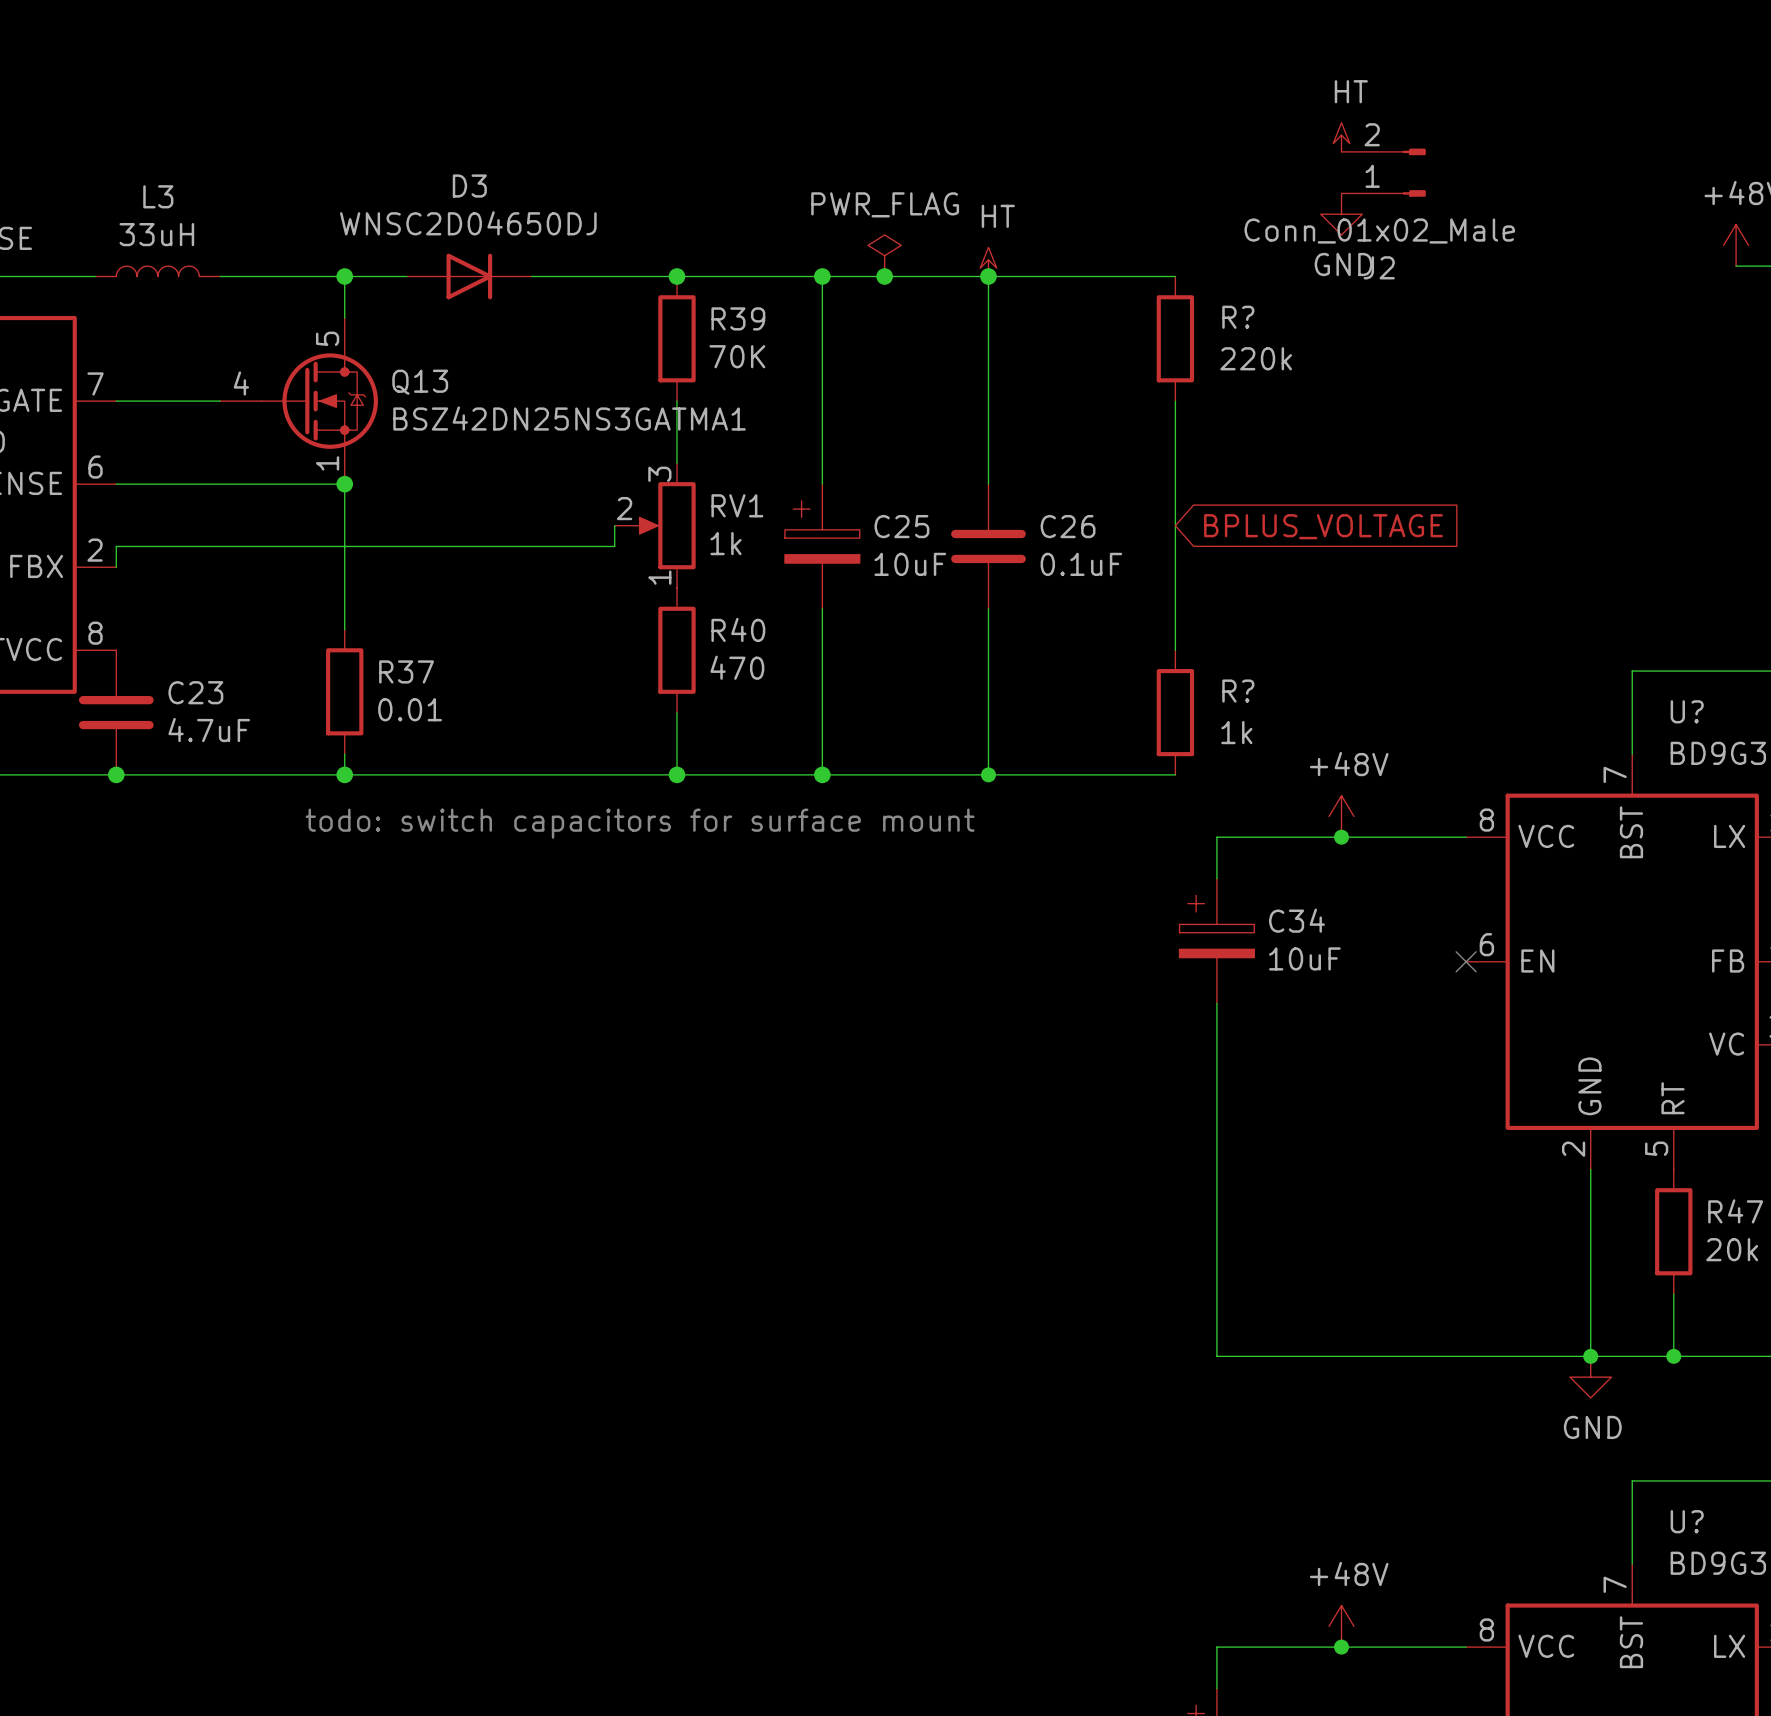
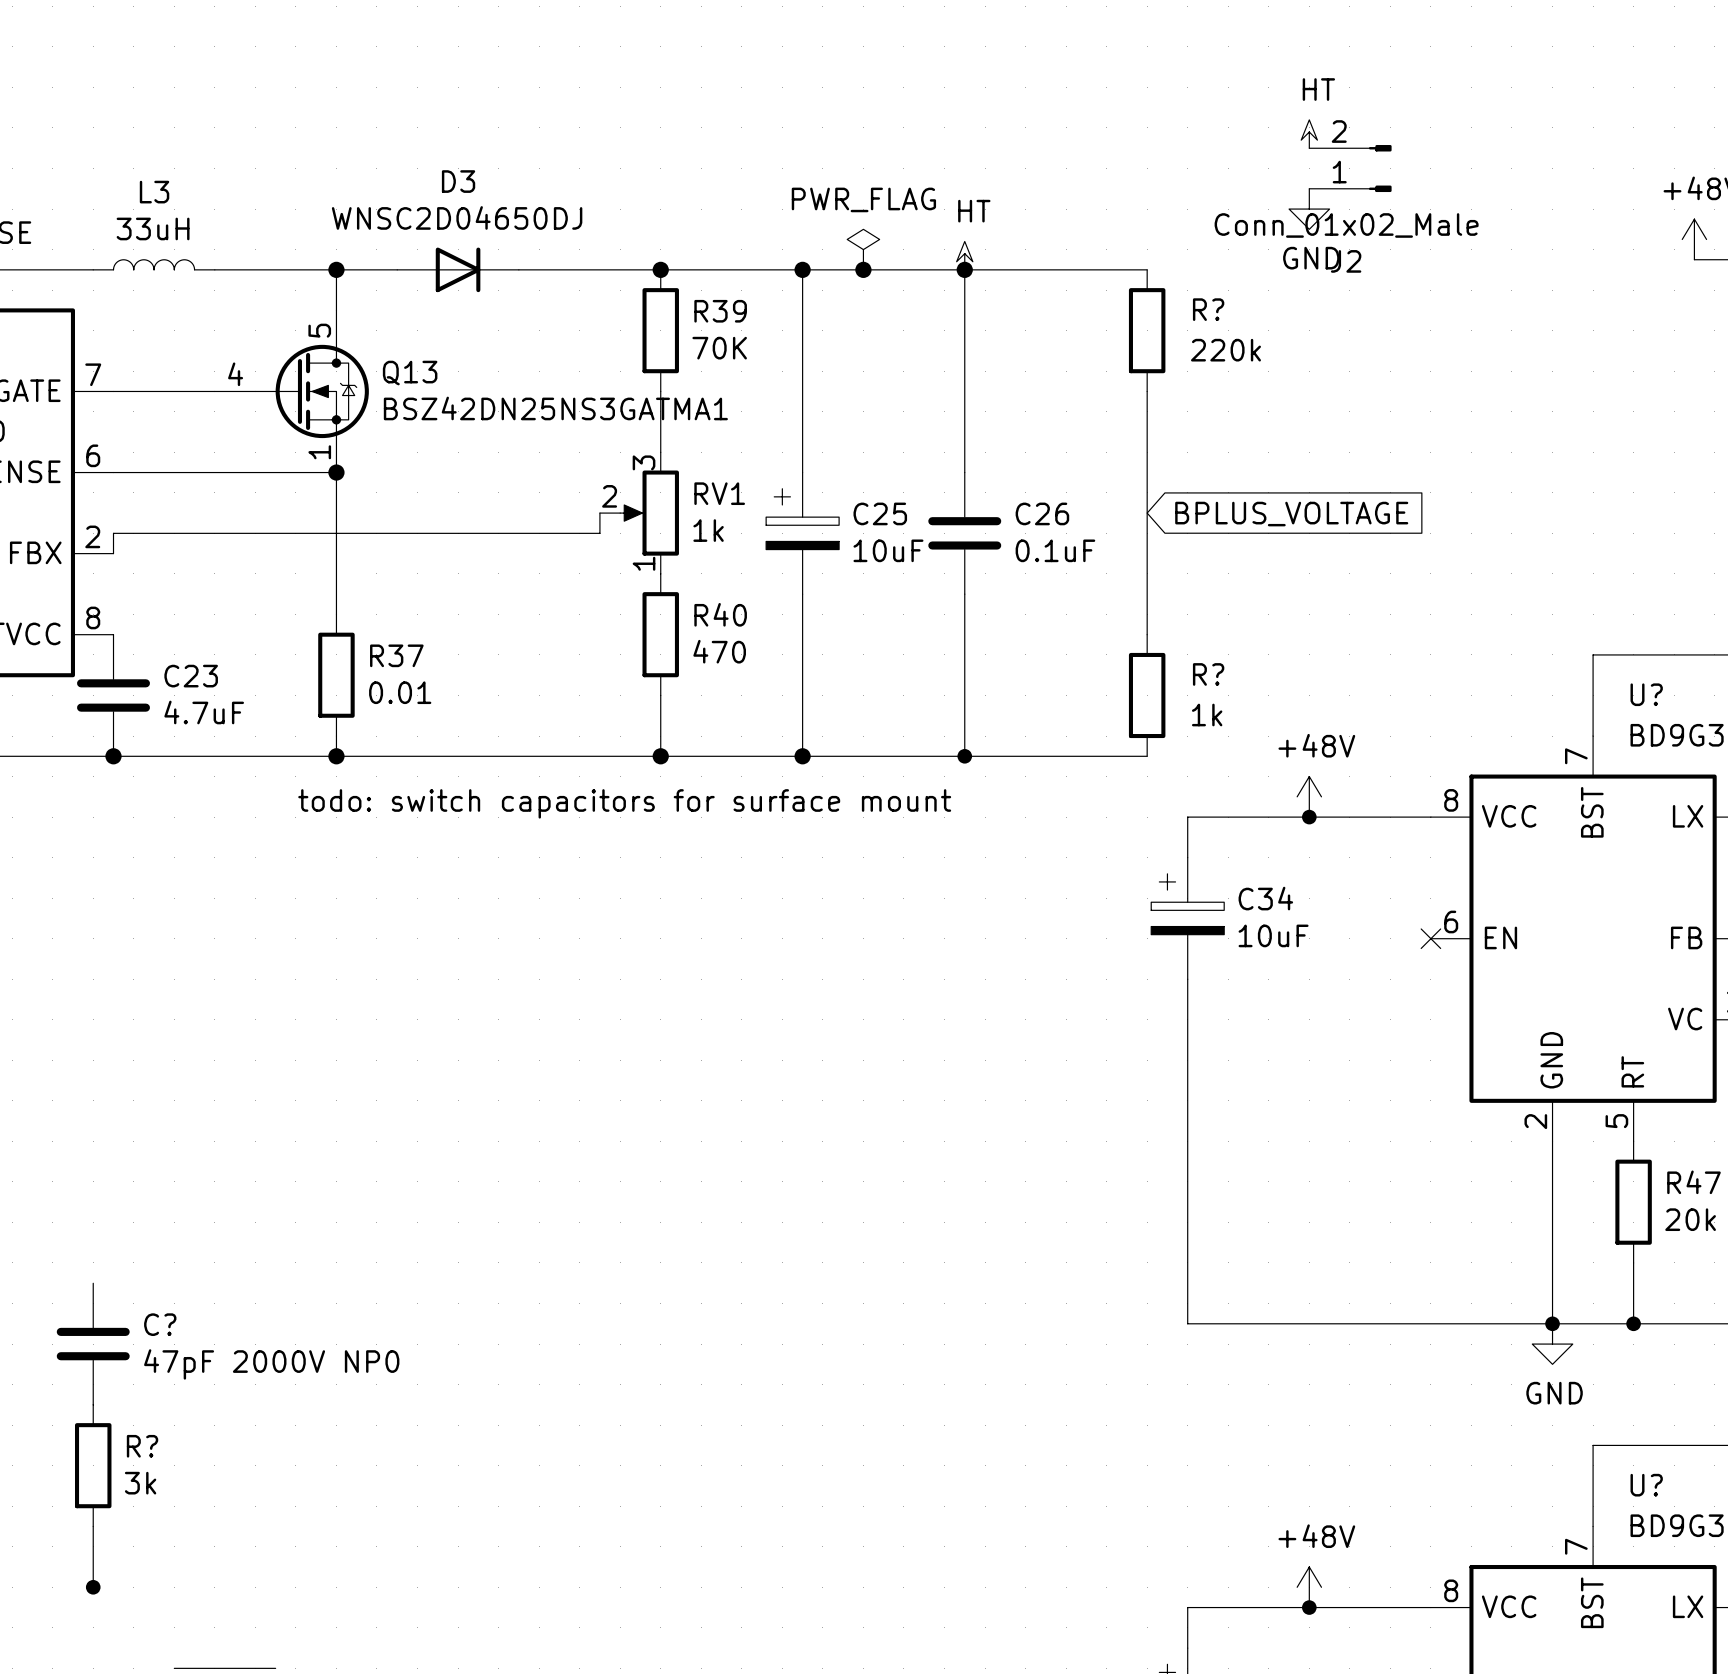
C?: none -> 47pF 2000V NP0 (93, 1344)
R?: none -> 3k (93, 1465)
wire: none -> (93, 1526) (93, 1587)
junction: none -> (93, 1587)
wire: none -> (174, 1668) (275, 1668)

